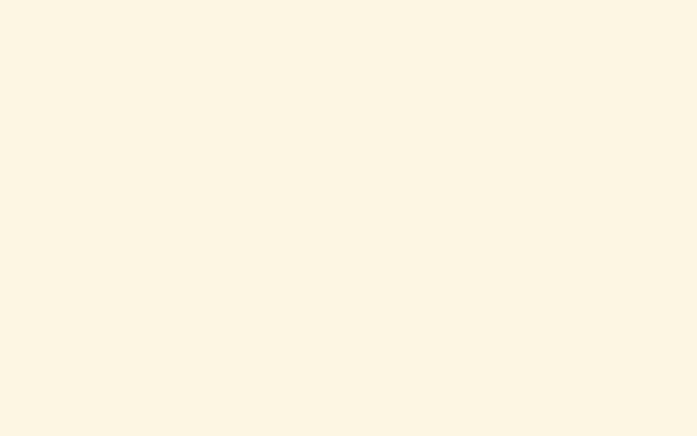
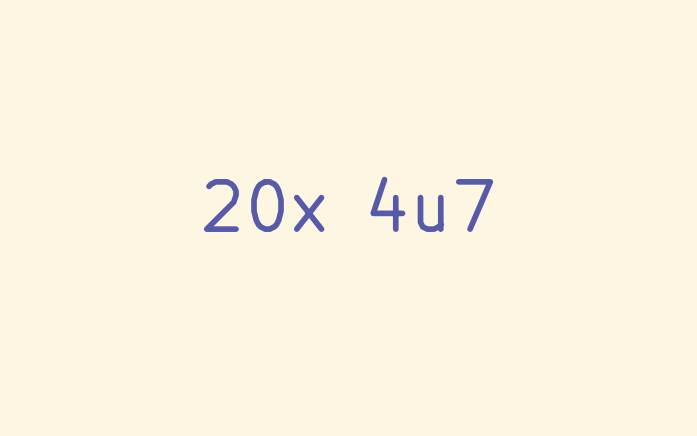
text: none -> 20x 4u7 (348, 204)

